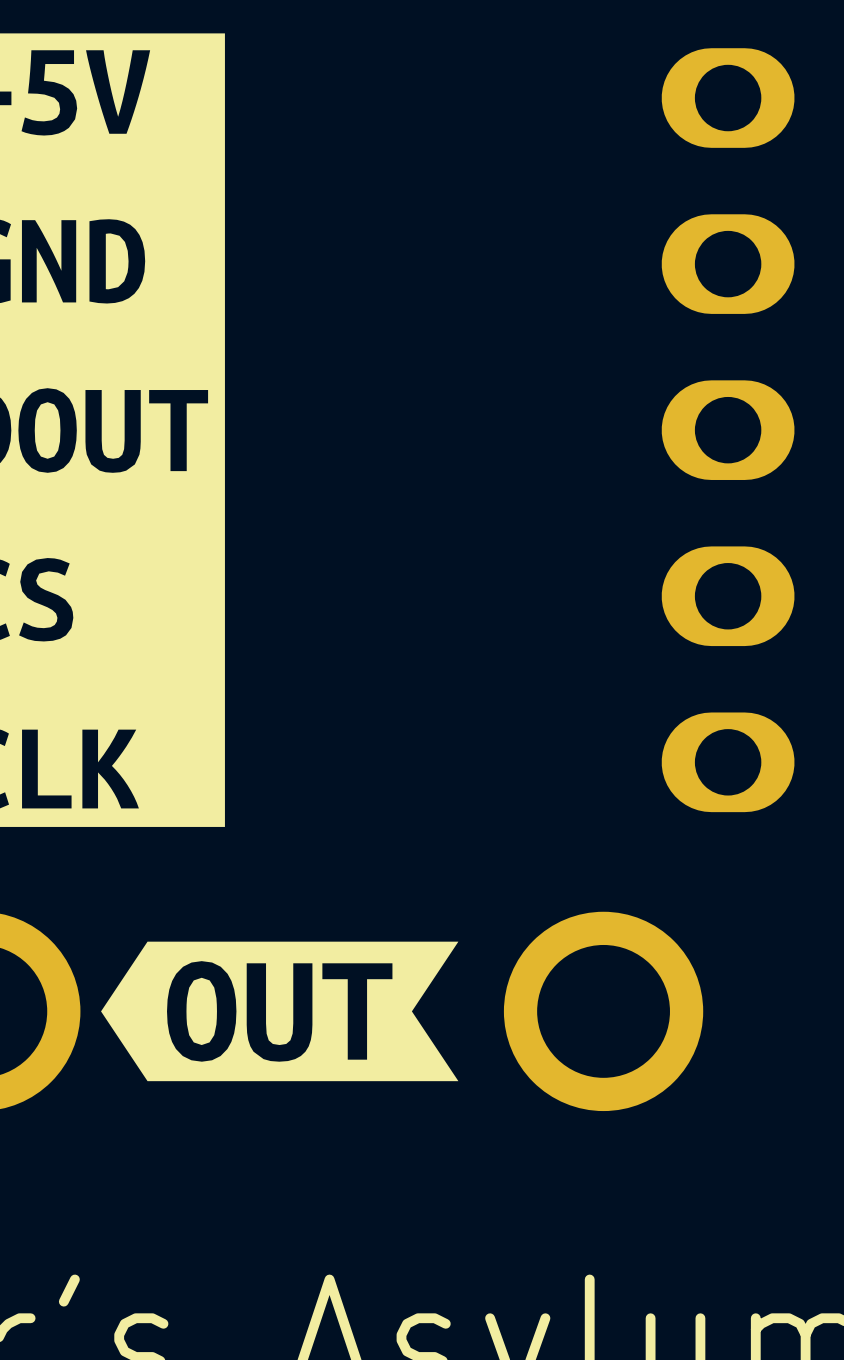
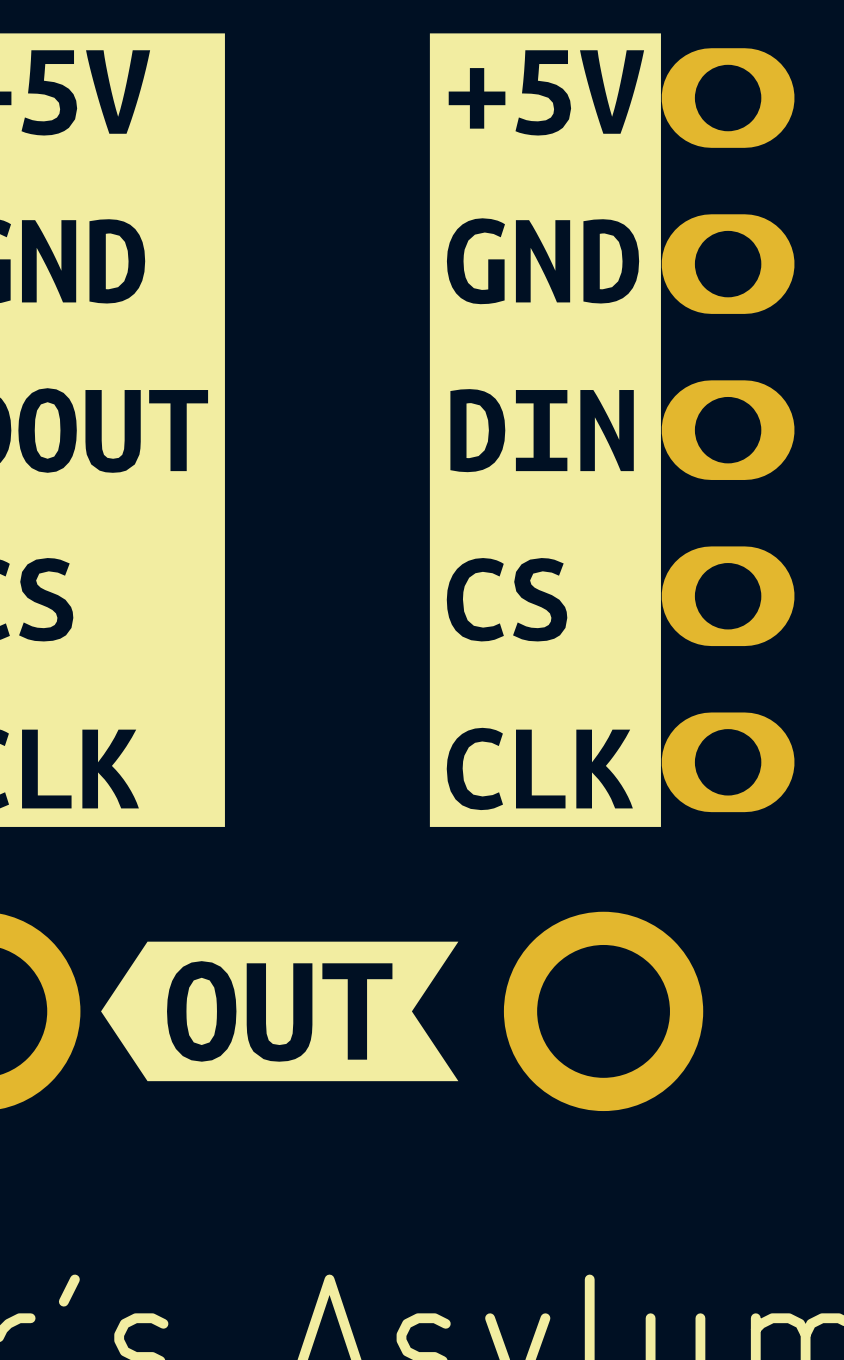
drawing: none -> [429, 33, 661, 827]

